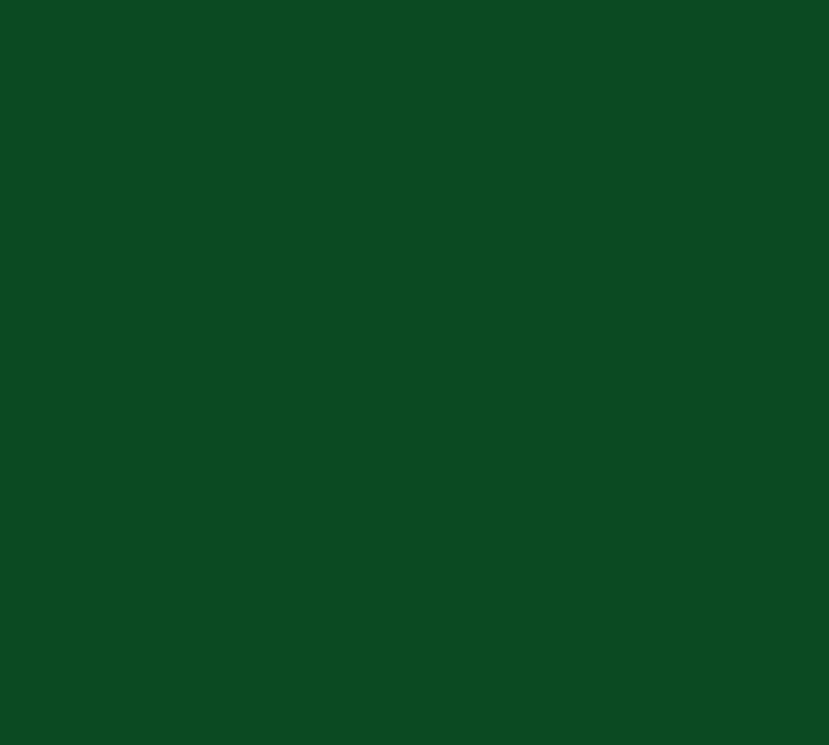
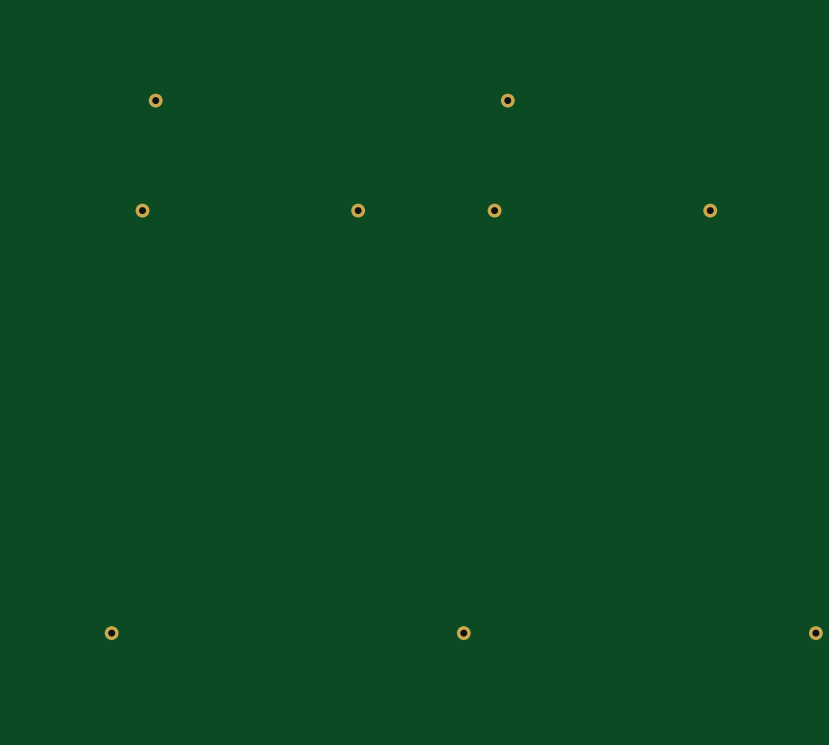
via: none -> (155, 100)
via: none -> (507, 100)
via: none -> (142, 210)
via: none -> (358, 210)
via: none -> (494, 210)
via: none -> (710, 210)
via: none -> (111, 633)
via: none -> (463, 633)
via: none -> (815, 633)

